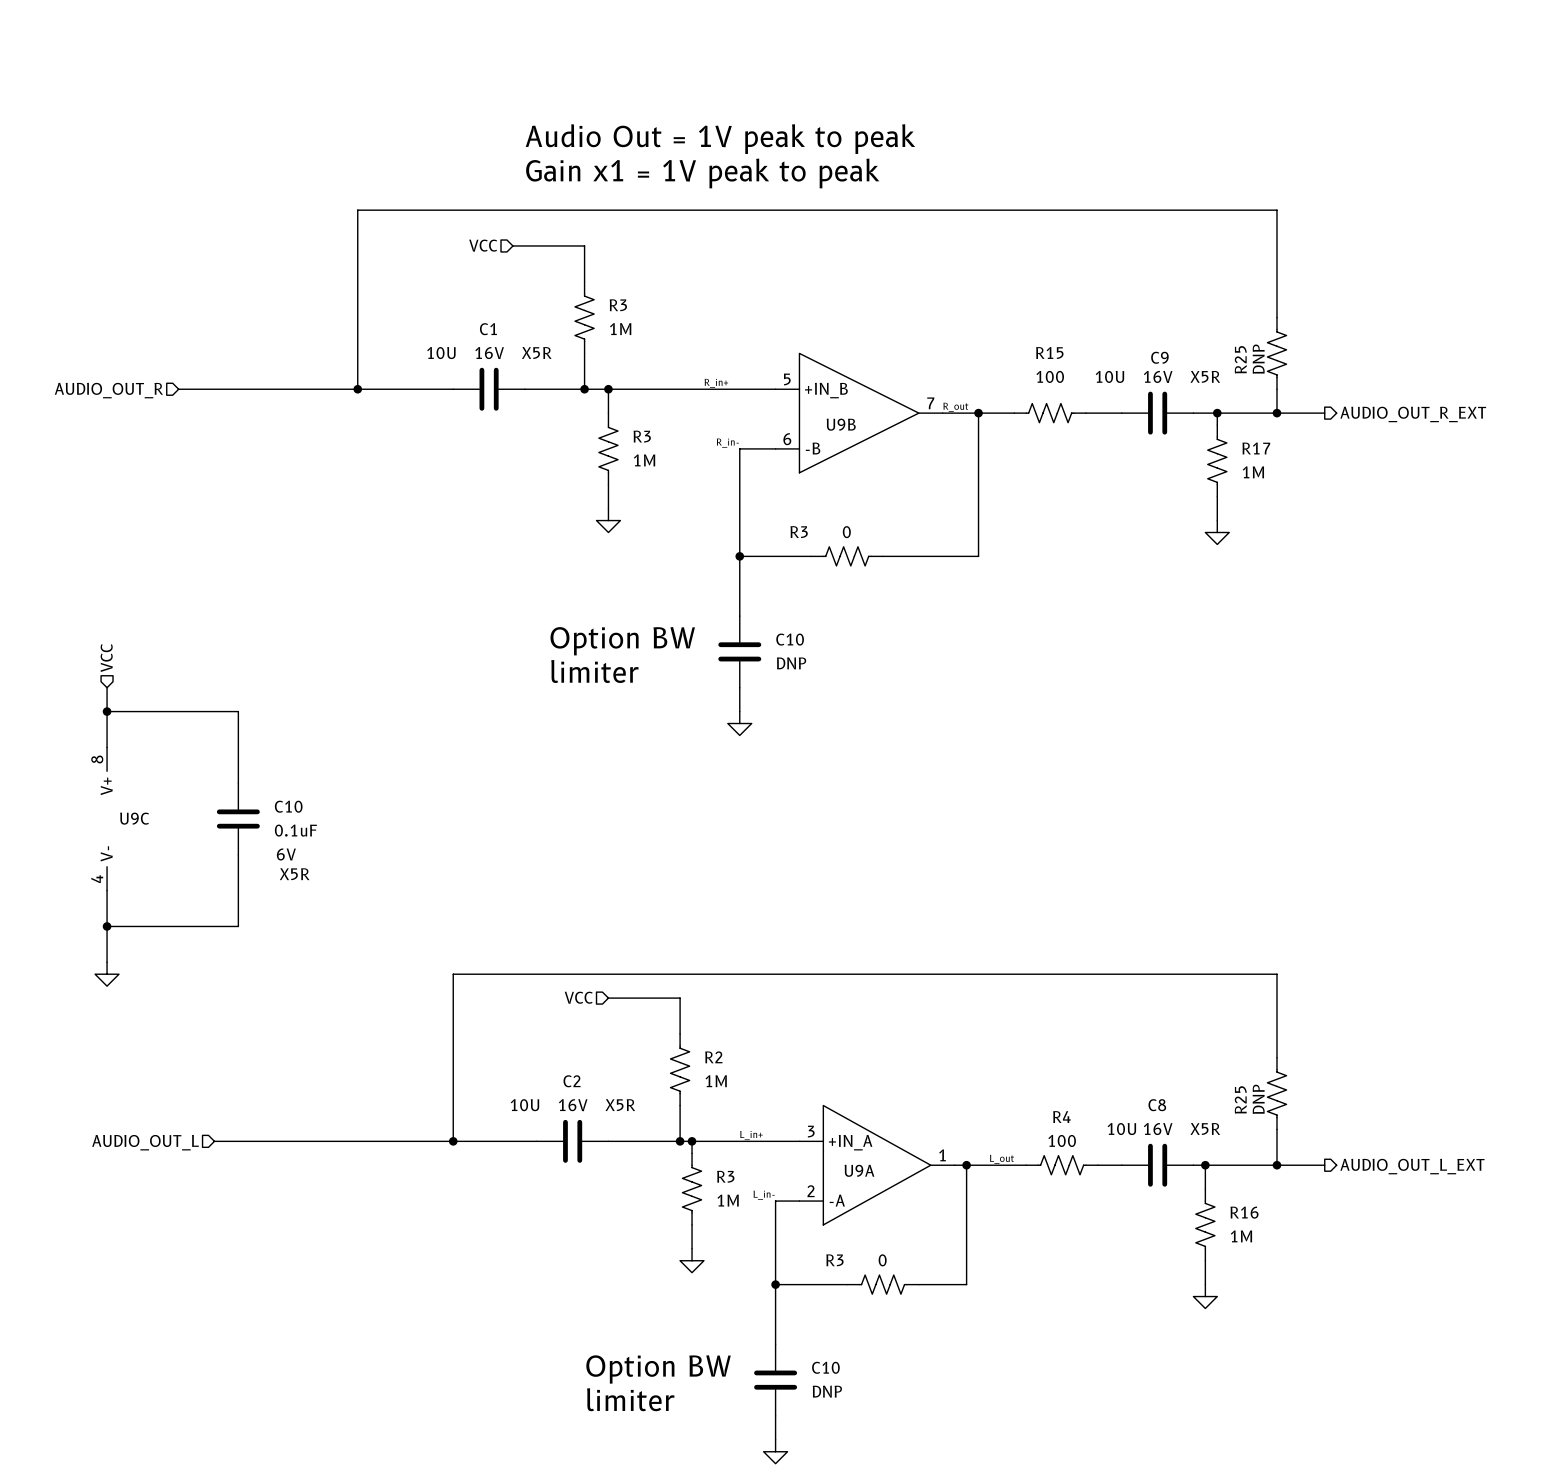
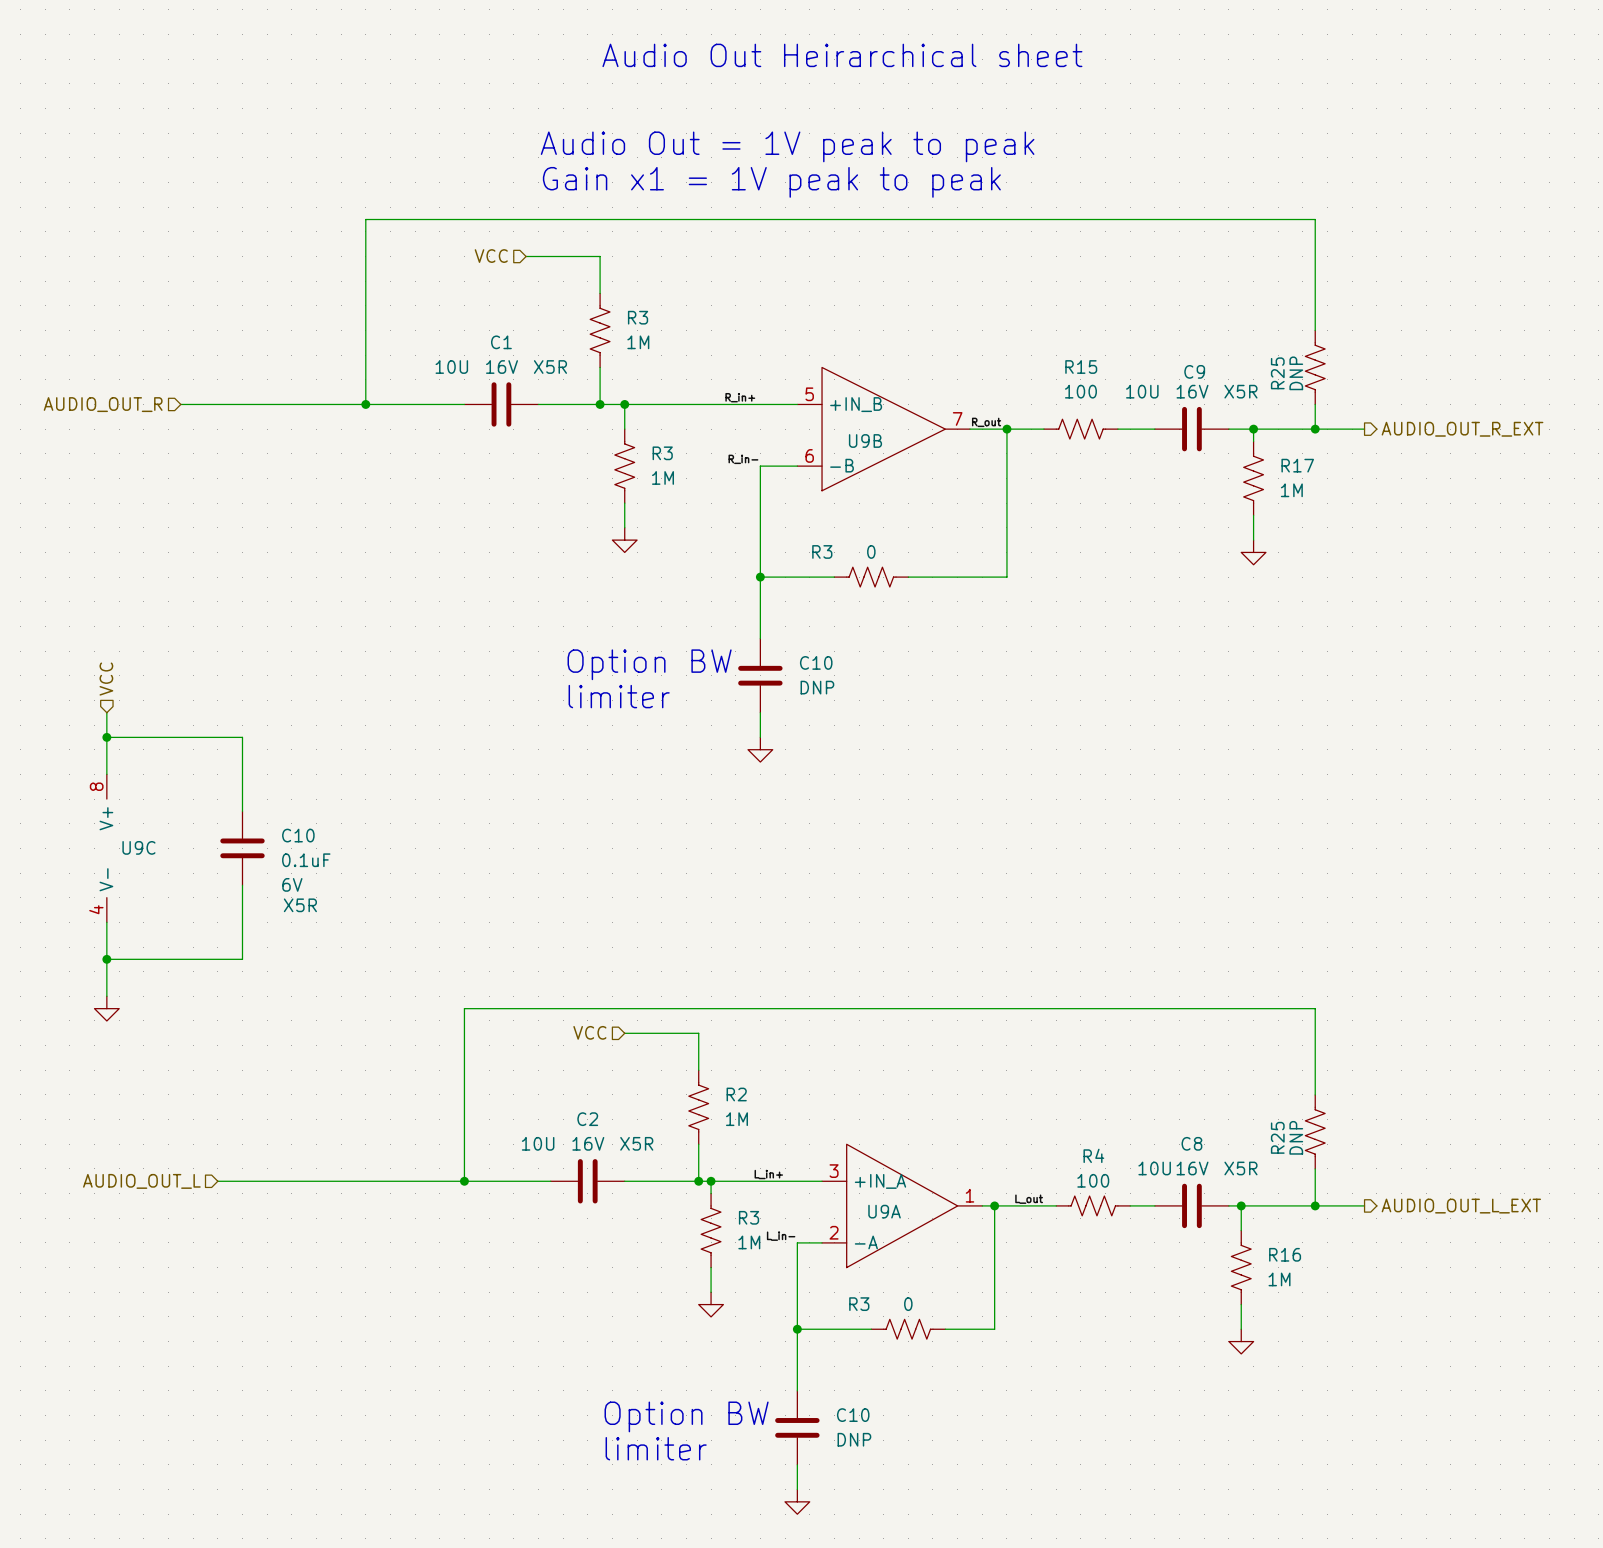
text: none -> Audio Out Heirarchical sheet (842, 55)

